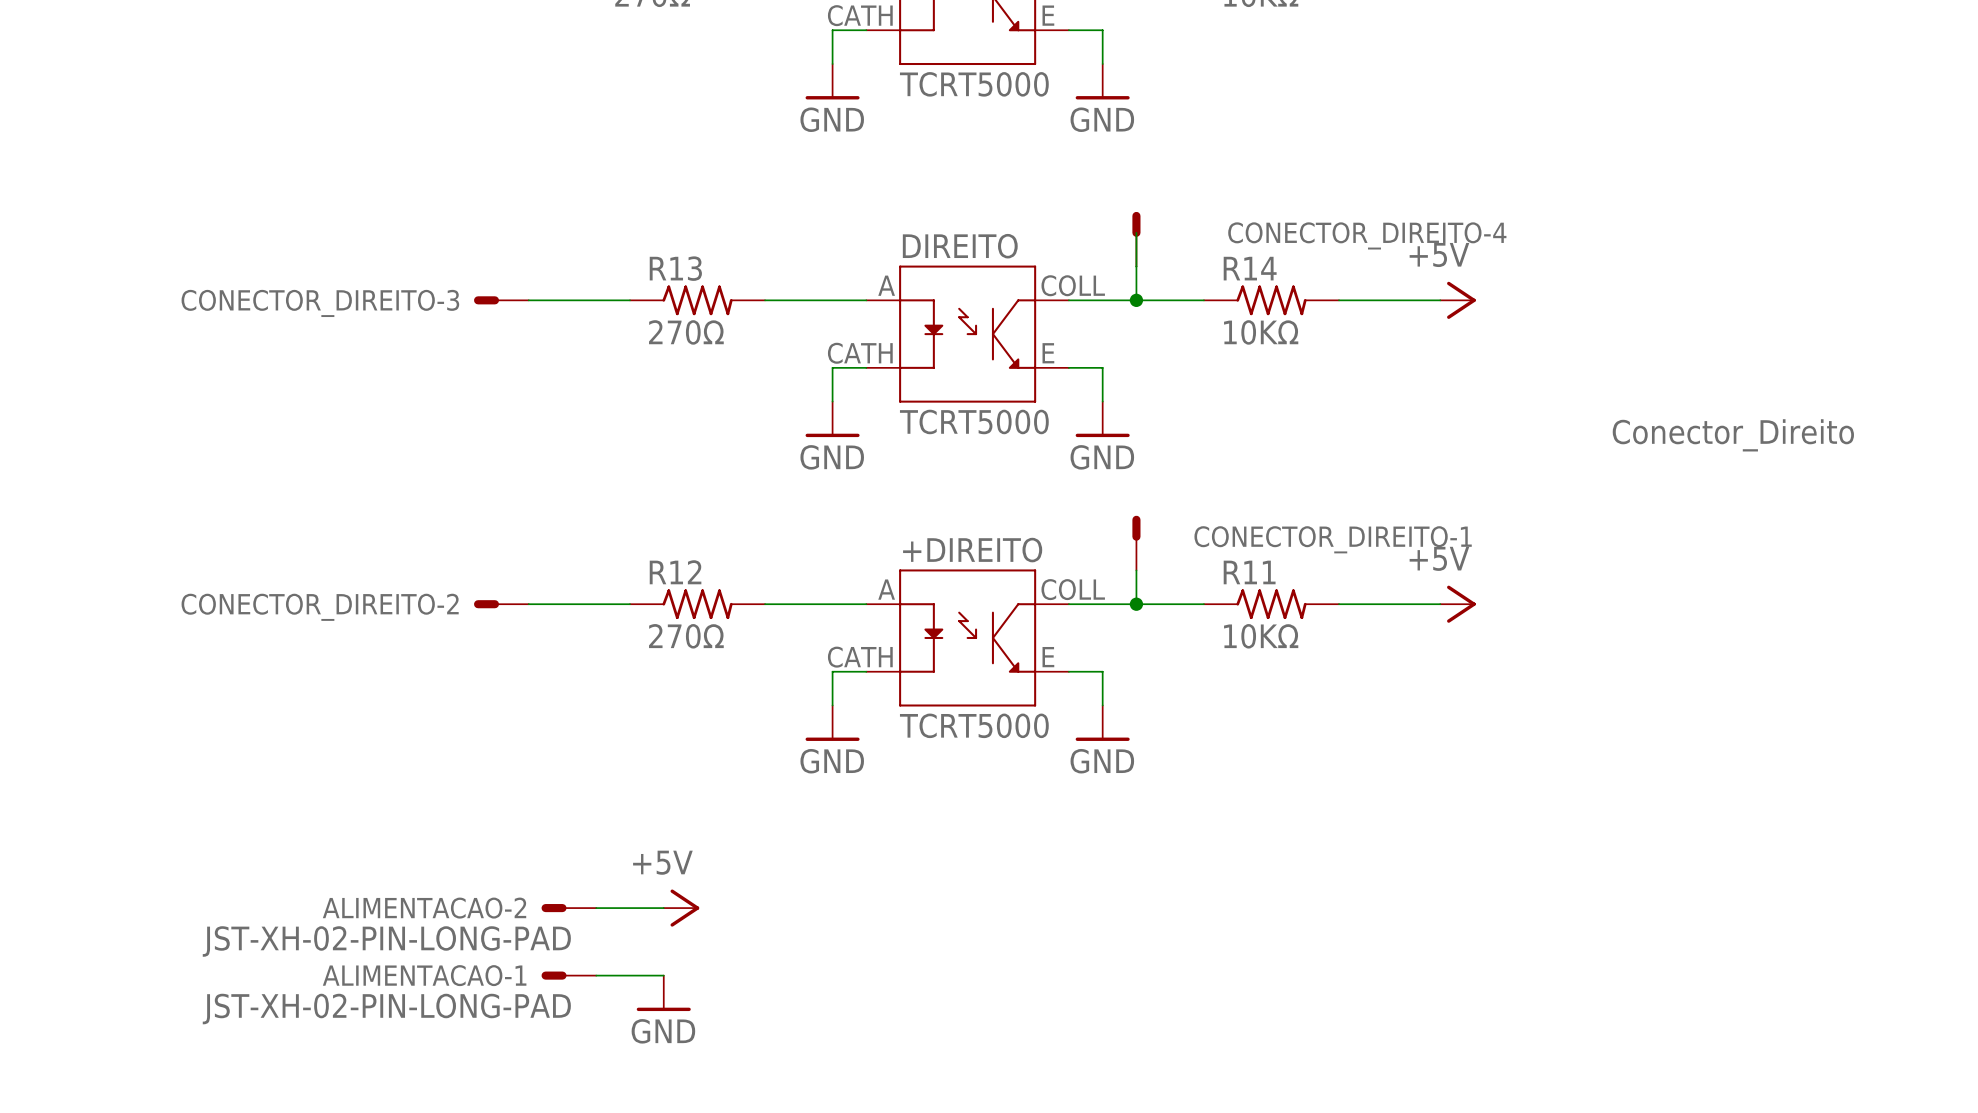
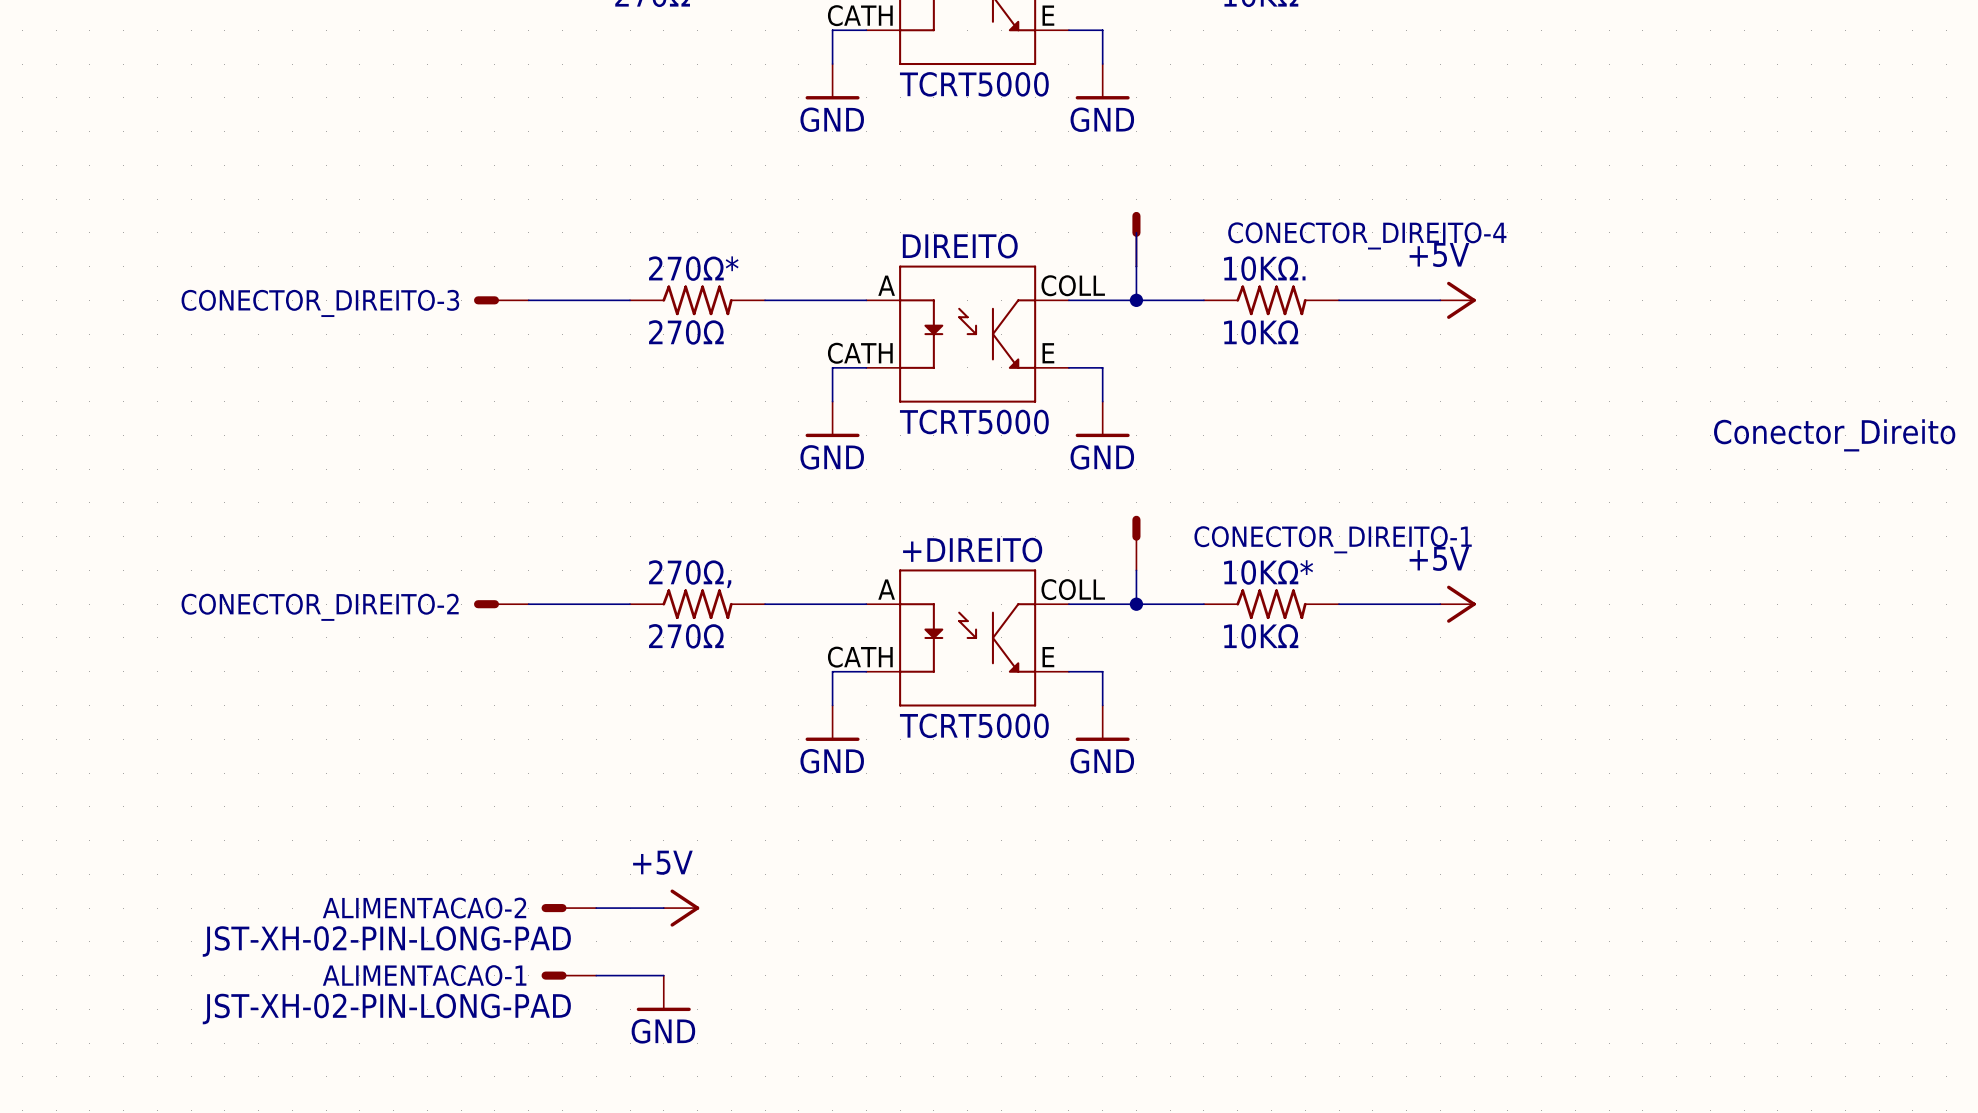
R13 name: R13 (675, 268) -> 270Ω* (693, 268)
R14 name: R14 (1250, 268) -> 10KΩ. (1264, 268)
CONECTOR_DIREITO-1 value position: Conector_Direito (1733, 435) -> Conector_Direito (1834, 435)
R12 name: R12 (675, 572) -> 270Ω, (690, 574)
R11 name: R11 (1249, 572) -> 10KΩ* (1268, 572)

